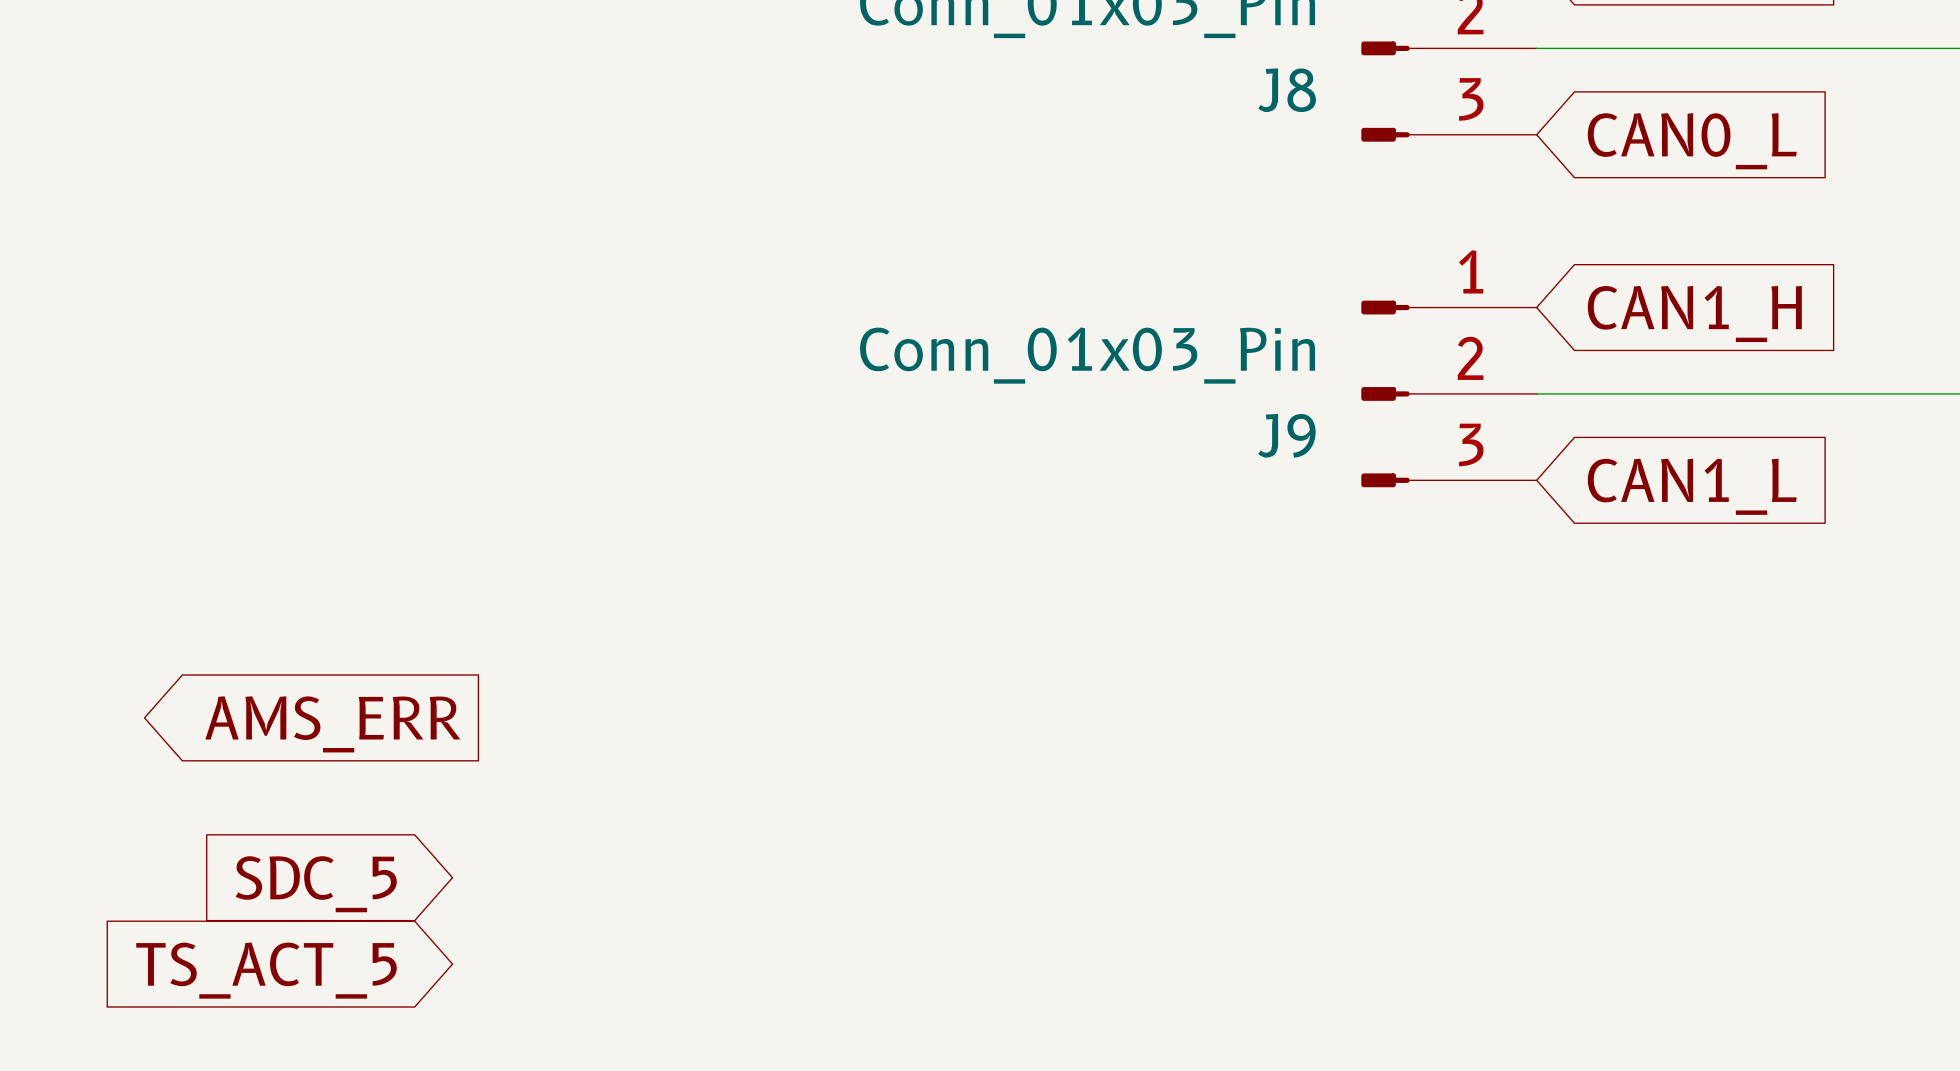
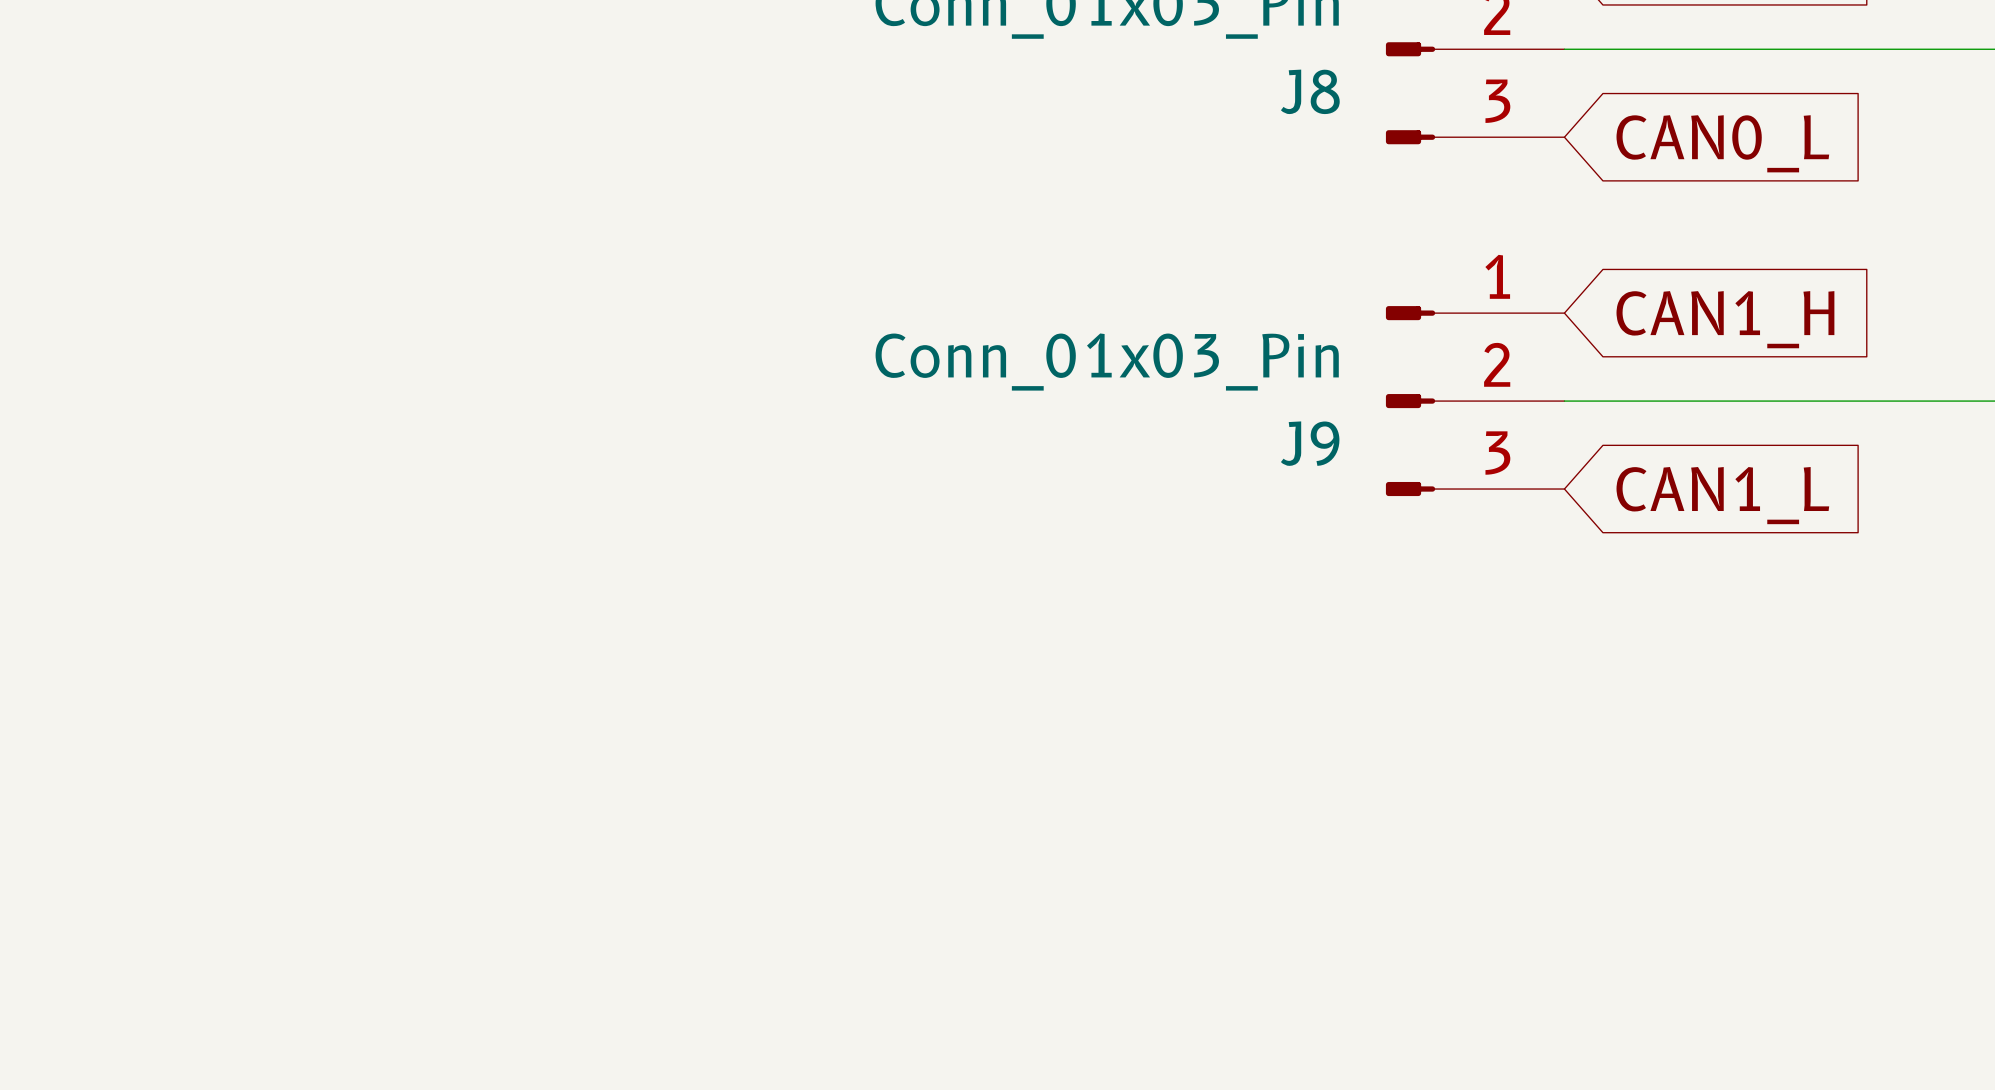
global label: AMS_ERR (332, 724) -> none
global label: SDC_5 (316, 884) -> none
global label: TS_ACT_5 (266, 970) -> none

